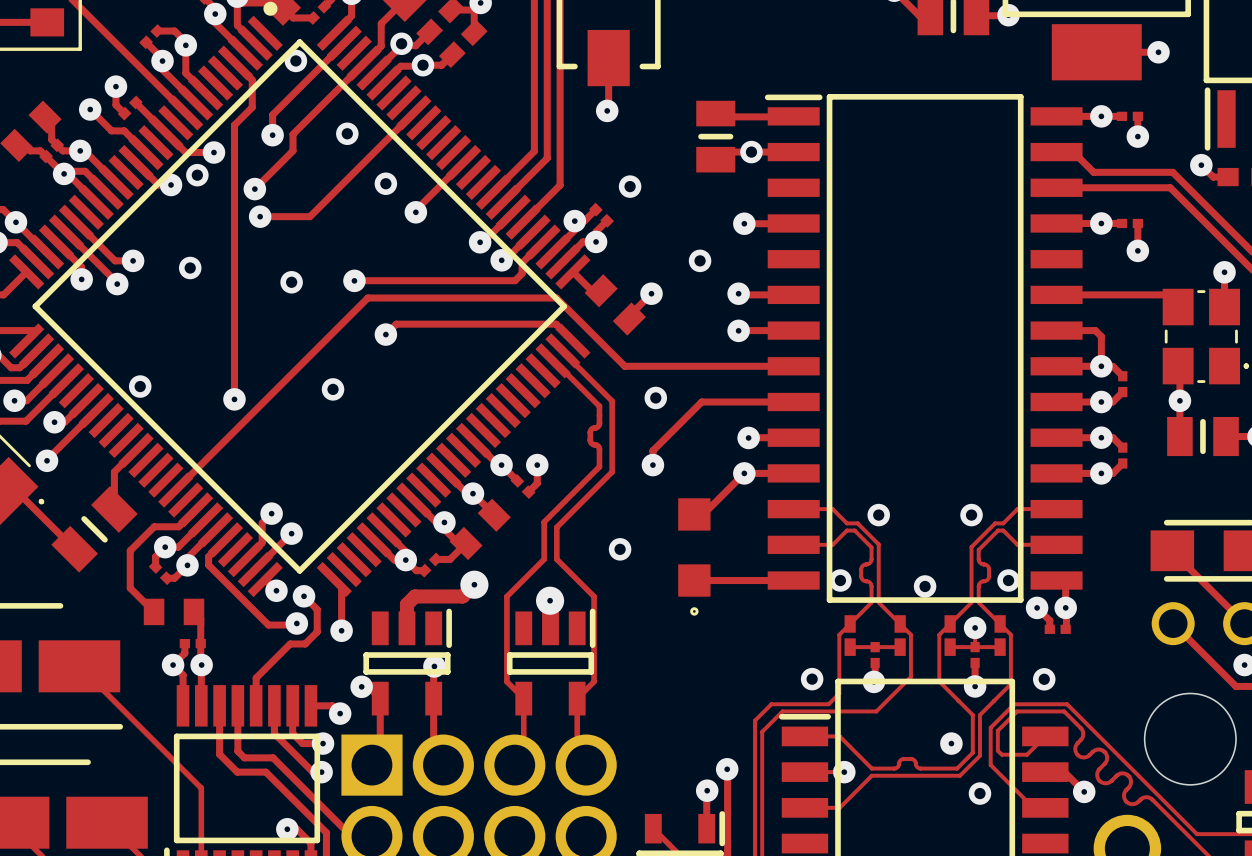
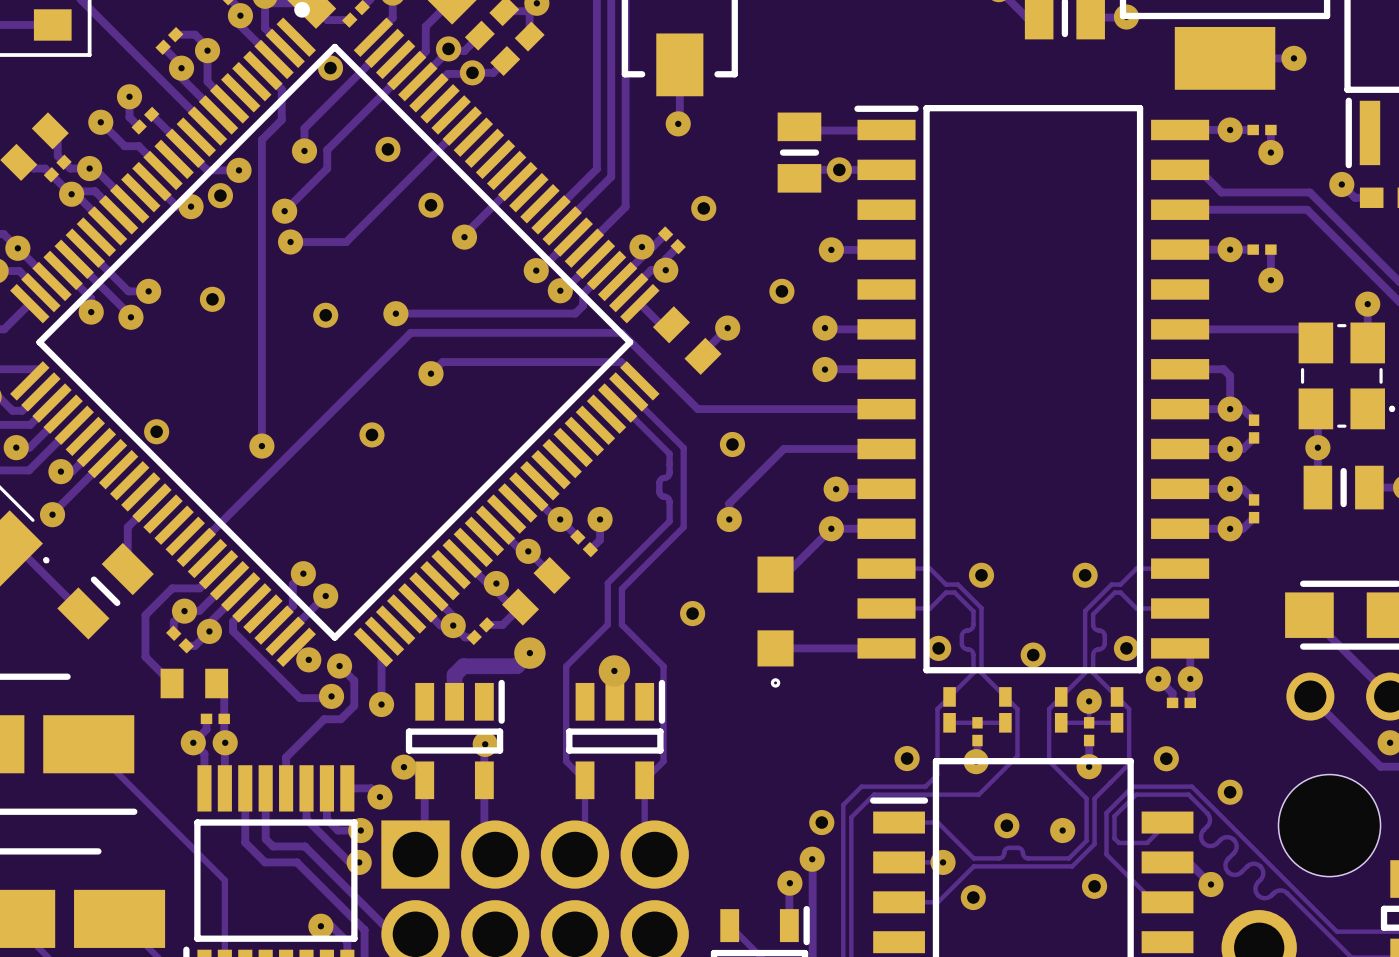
via: none -> (1230, 792)
via: none -> (821, 822)
via: none -> (1006, 825)
via: none -> (973, 897)

